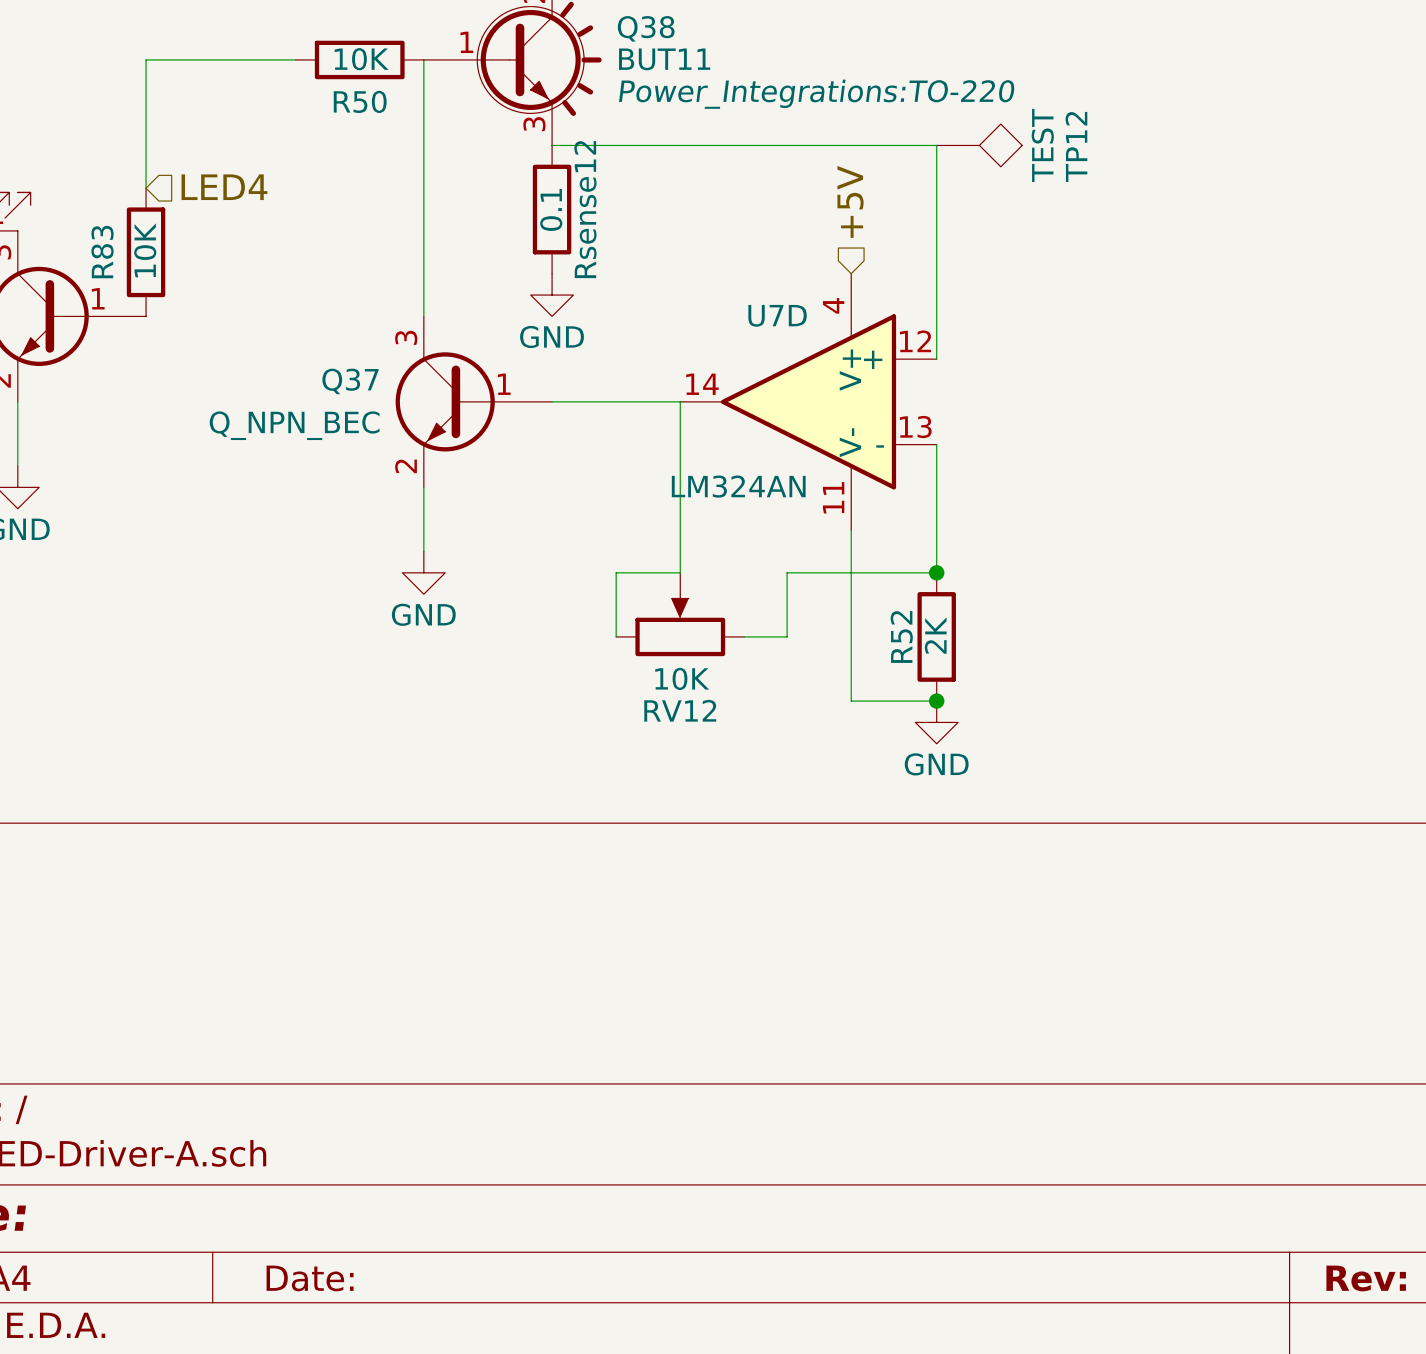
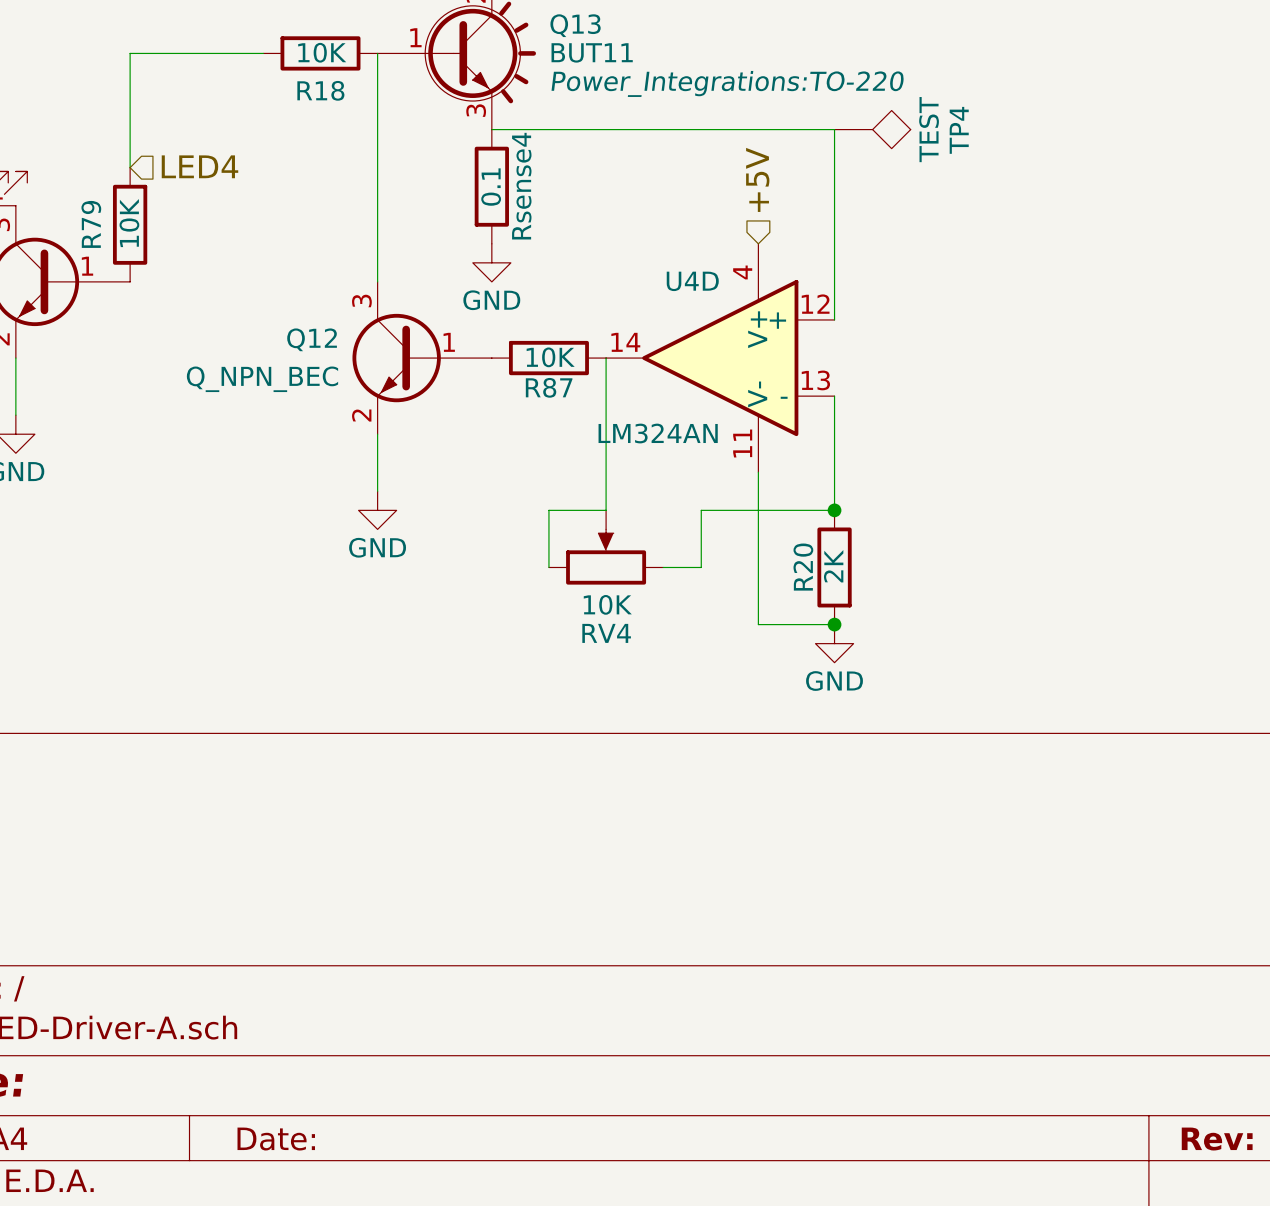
Q38 name: Q38 (646, 28) -> Q13 (575, 25)
R50 name: R50 (360, 101) -> R18 (320, 90)
TP12 name: TP12 (1076, 146) -> TP4 (959, 130)
Rsense12 name: Rsense12 (585, 209) -> Rsense4 (521, 186)
R83 name: R83 (102, 252) -> R79 (91, 224)
U7D name: U7D (777, 315) -> U4D (692, 281)
Q37 name: Q37 (350, 381) -> Q12 (312, 339)
wire: (552, 401) (680, 401) -> none
R87: none -> 10K (548, 358)
R52 name: R52 (901, 636) -> R20 (803, 567)
RV12 name: RV12 (680, 710) -> RV4 (606, 633)

